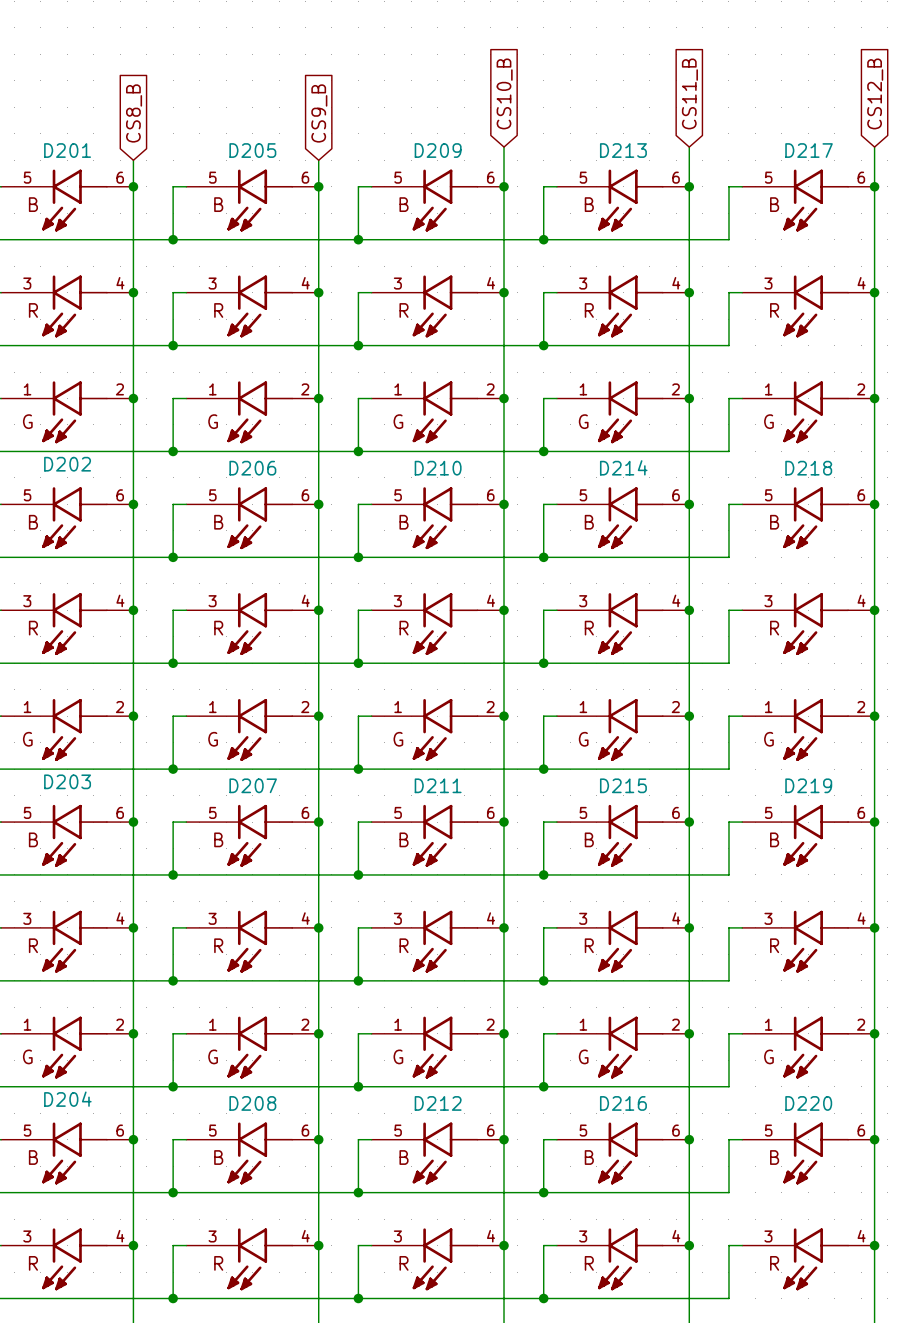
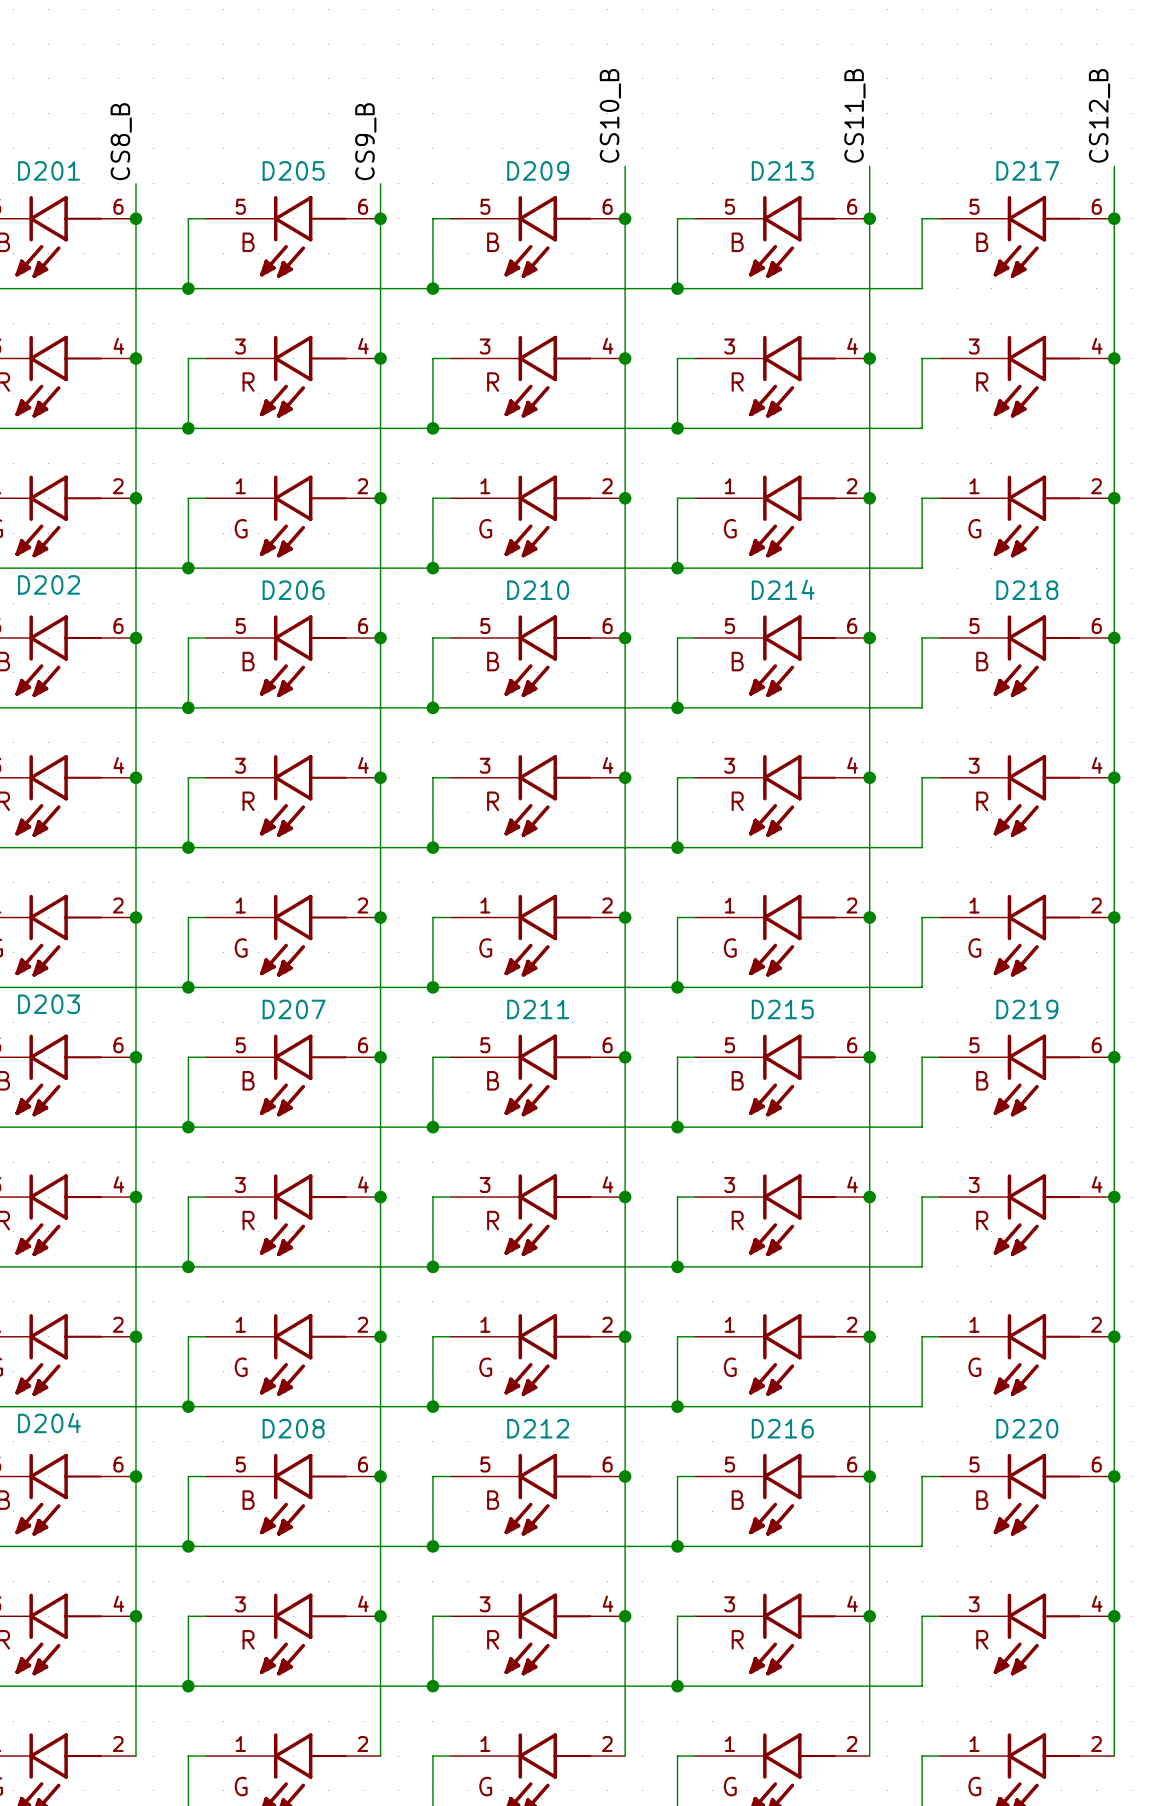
global label: CS10_B (504, 93) -> none
global label: CS11_B (689, 93) -> none
global label: CS12_B (875, 93) -> none
label: none -> CS10_B (610, 115)
label: none -> CS11_B (854, 115)
label: none -> CS12_B (1099, 115)
global label: CS8_B (134, 113) -> none
global label: CS9_B (319, 113) -> none
label: none -> CS8_B (121, 141)
label: none -> CS9_B (365, 141)

